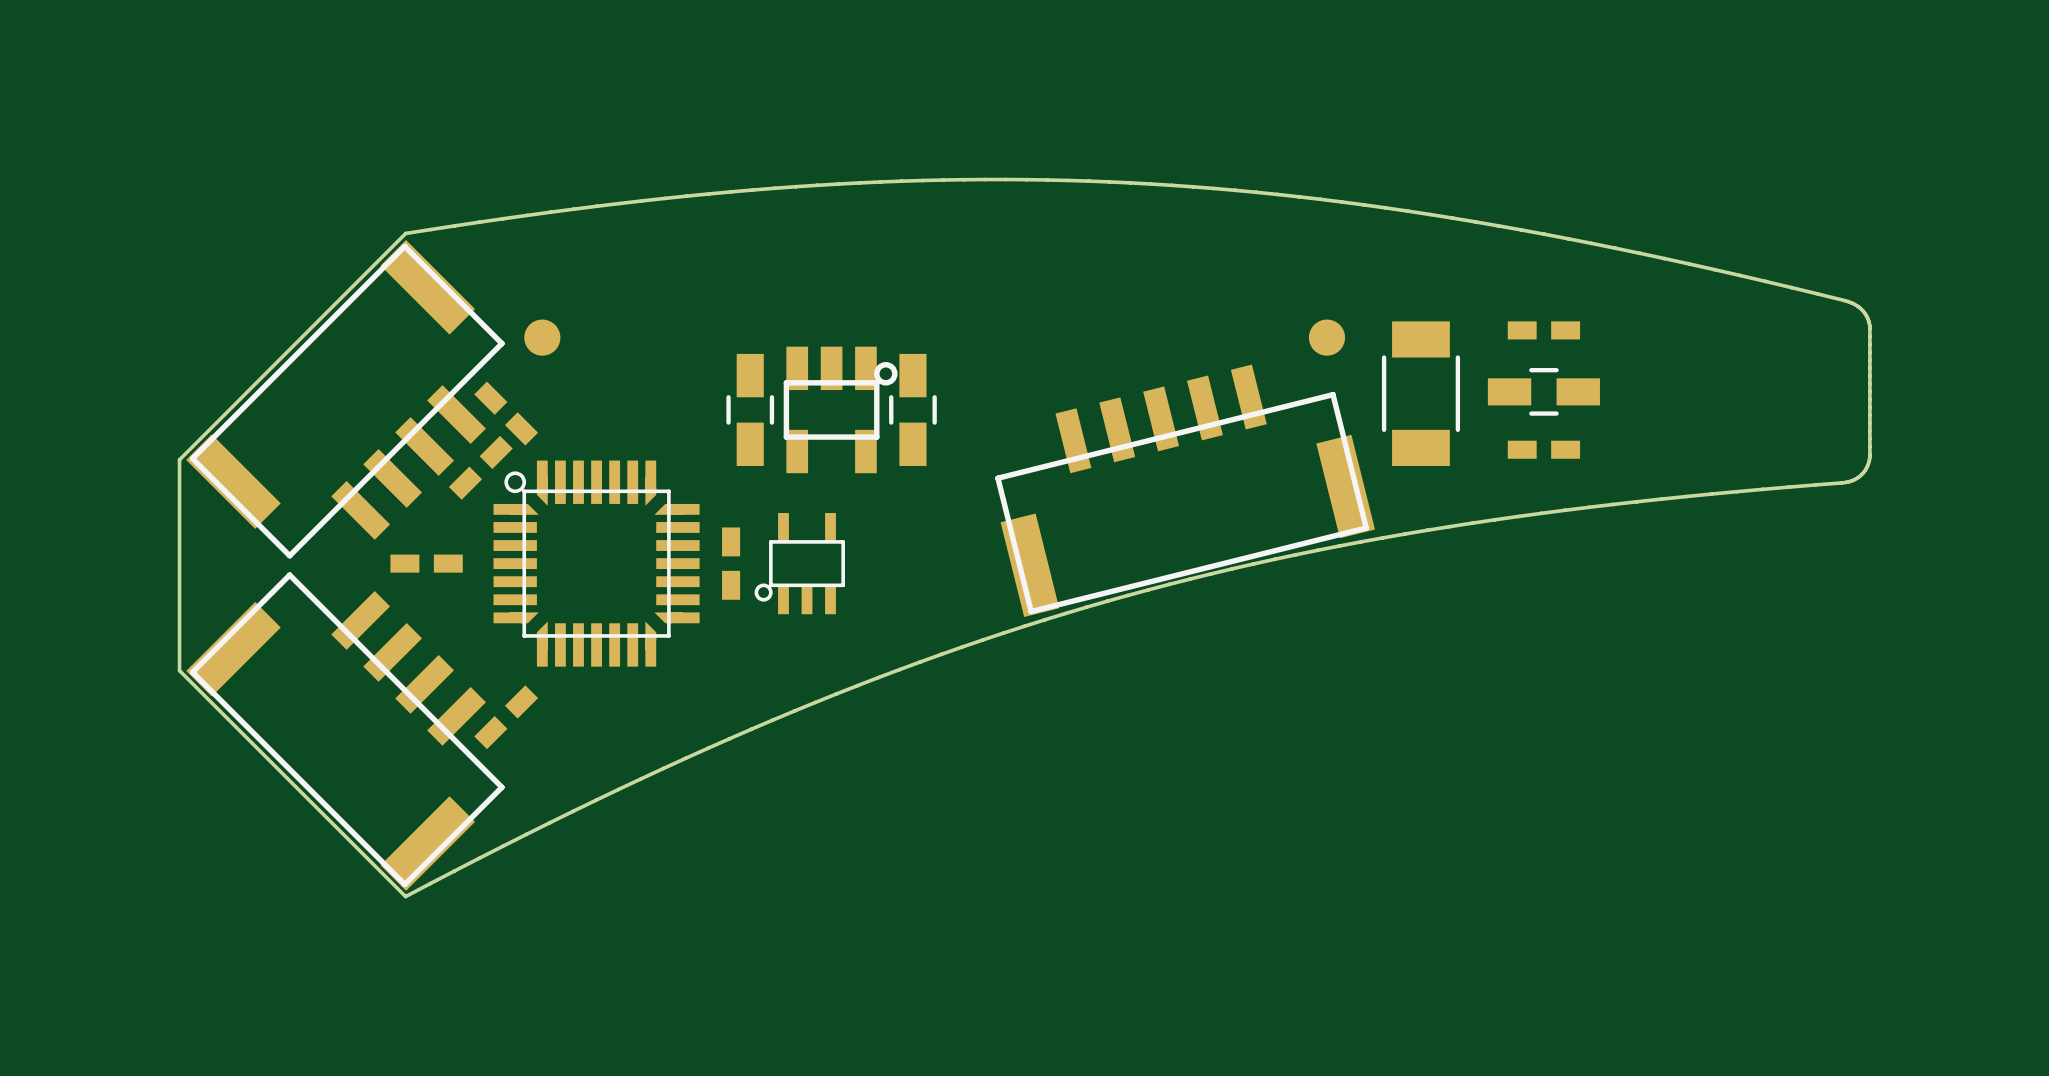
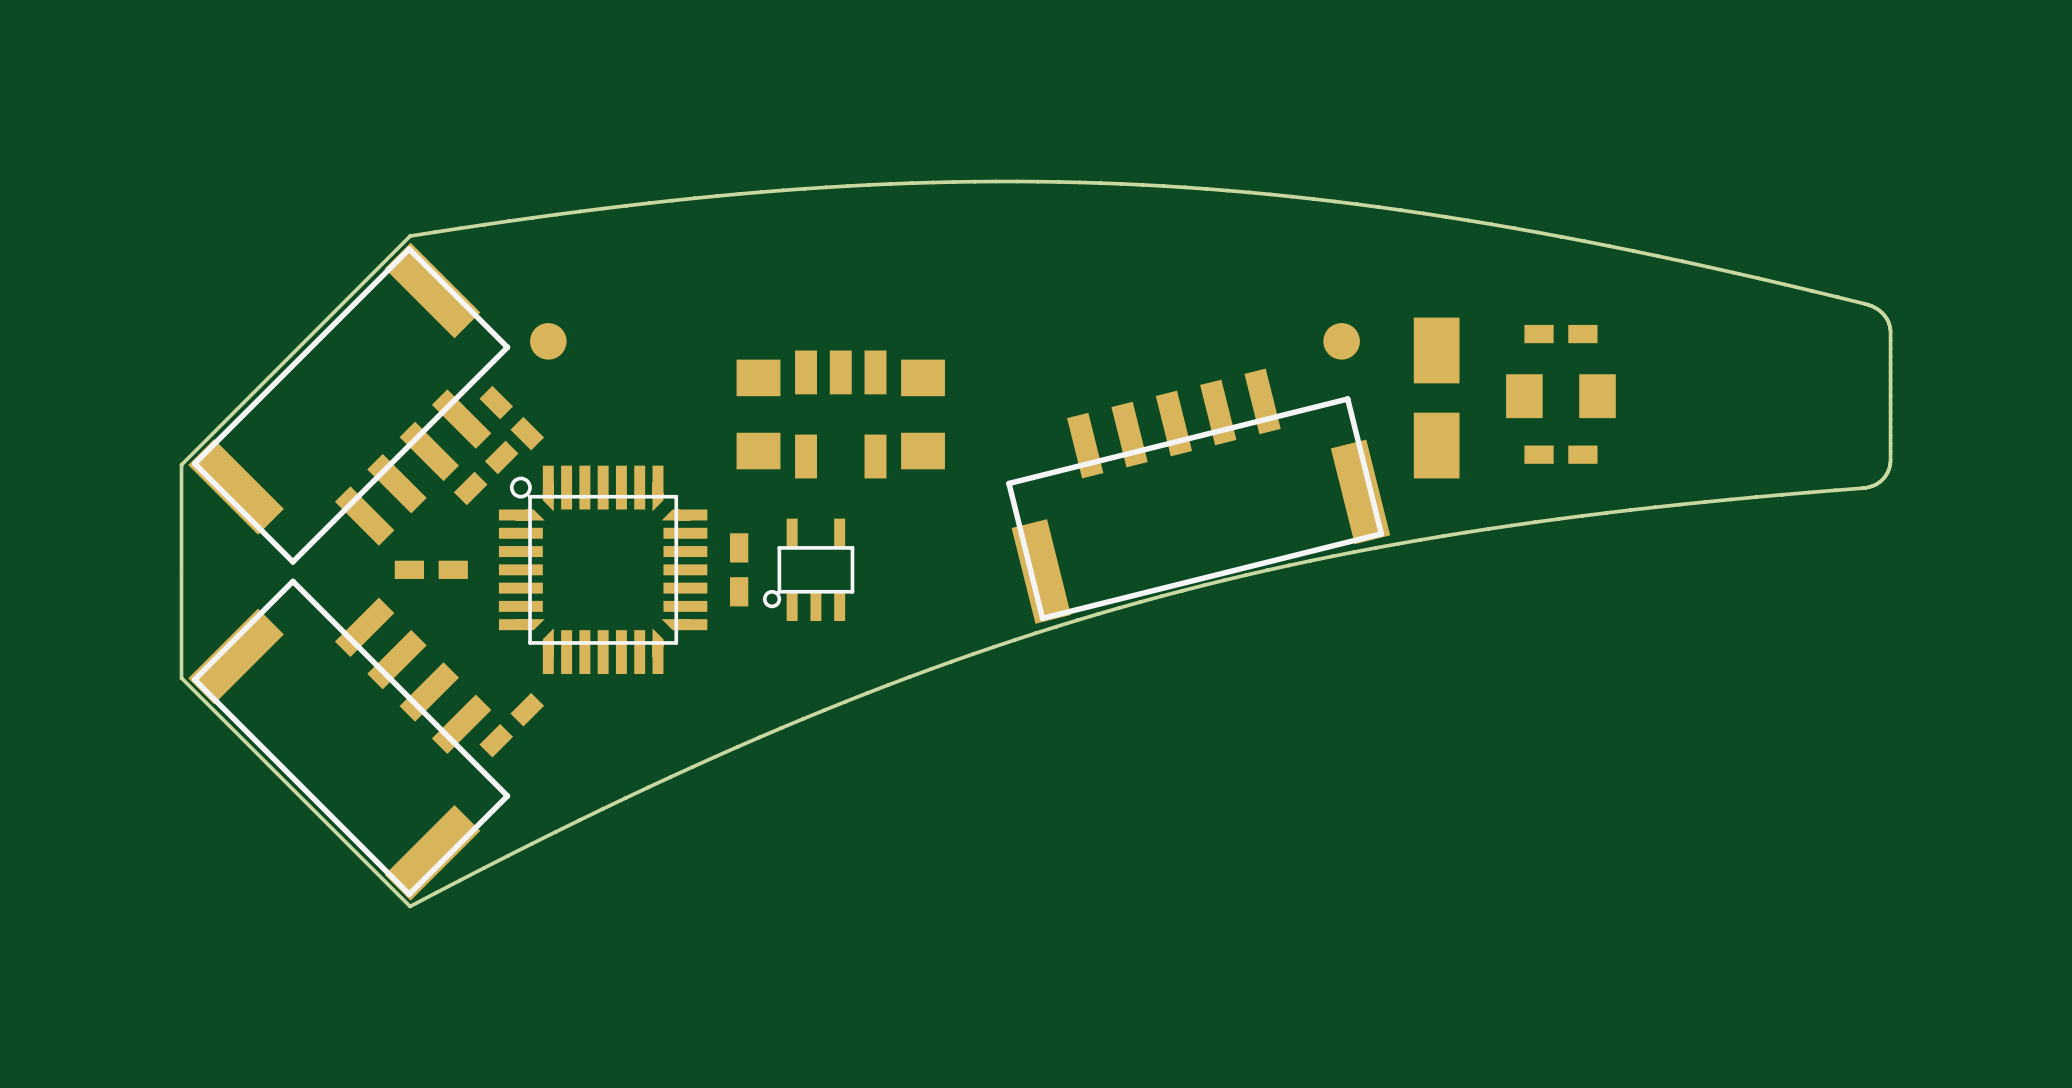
part footprint: [1381, 321, 1461, 466] -> [1413, 317, 1460, 479]
part footprint: [783, 346, 898, 474] -> [795, 350, 887, 479]
part footprint: [726, 353, 775, 466] -> [736, 359, 781, 470]
part footprint: [889, 353, 937, 466] -> [901, 359, 945, 470]
part footprint: [1487, 367, 1600, 416] -> [1506, 374, 1616, 419]

